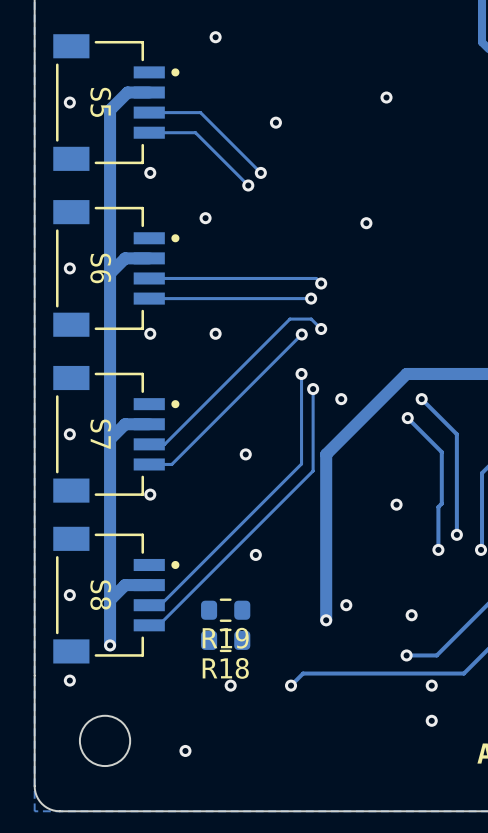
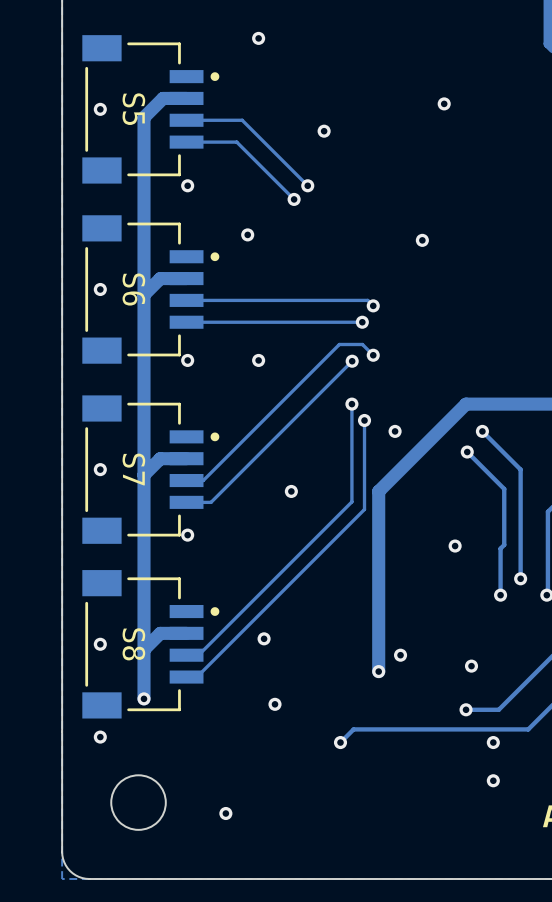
via: (255, 554) -> none
via: none -> (264, 638)
R19: (225, 610) -> none
R18: (225, 640) -> none
via position: (230, 685) -> (275, 704)

